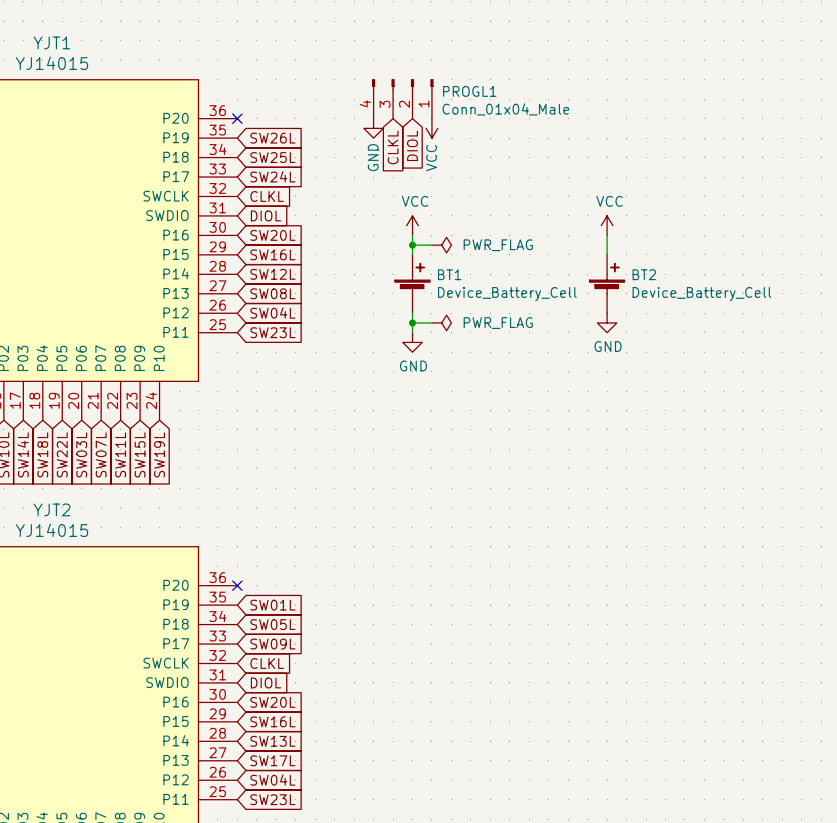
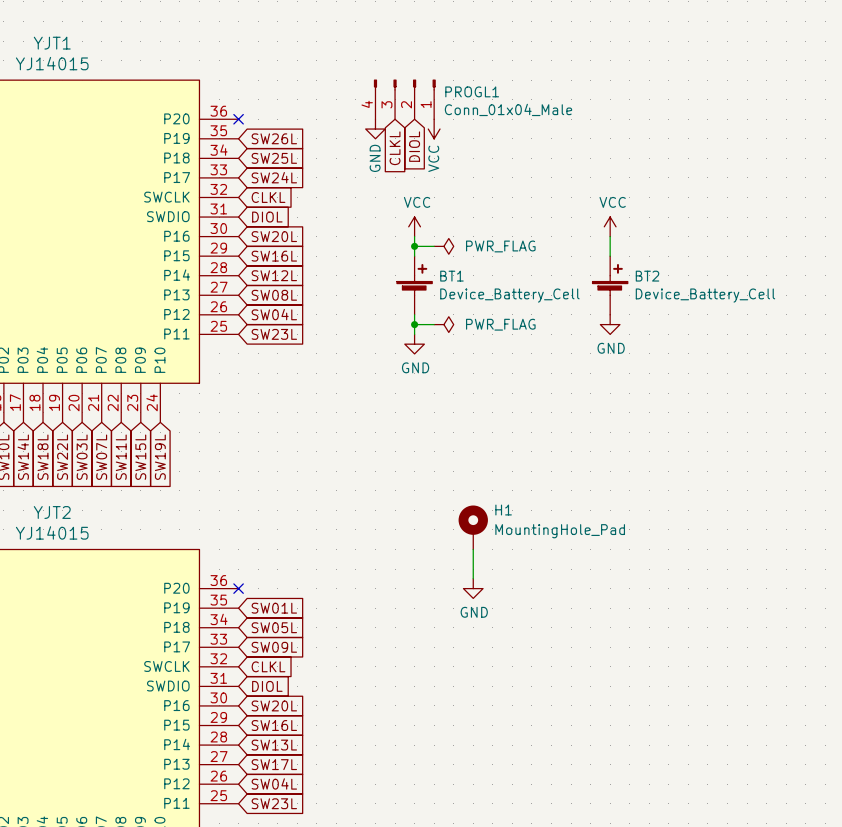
H1: none -> MountingHole_Pad (473, 527)
wire: none -> (473, 549) (473, 578)
power symbol: none -> GND (473, 588)

